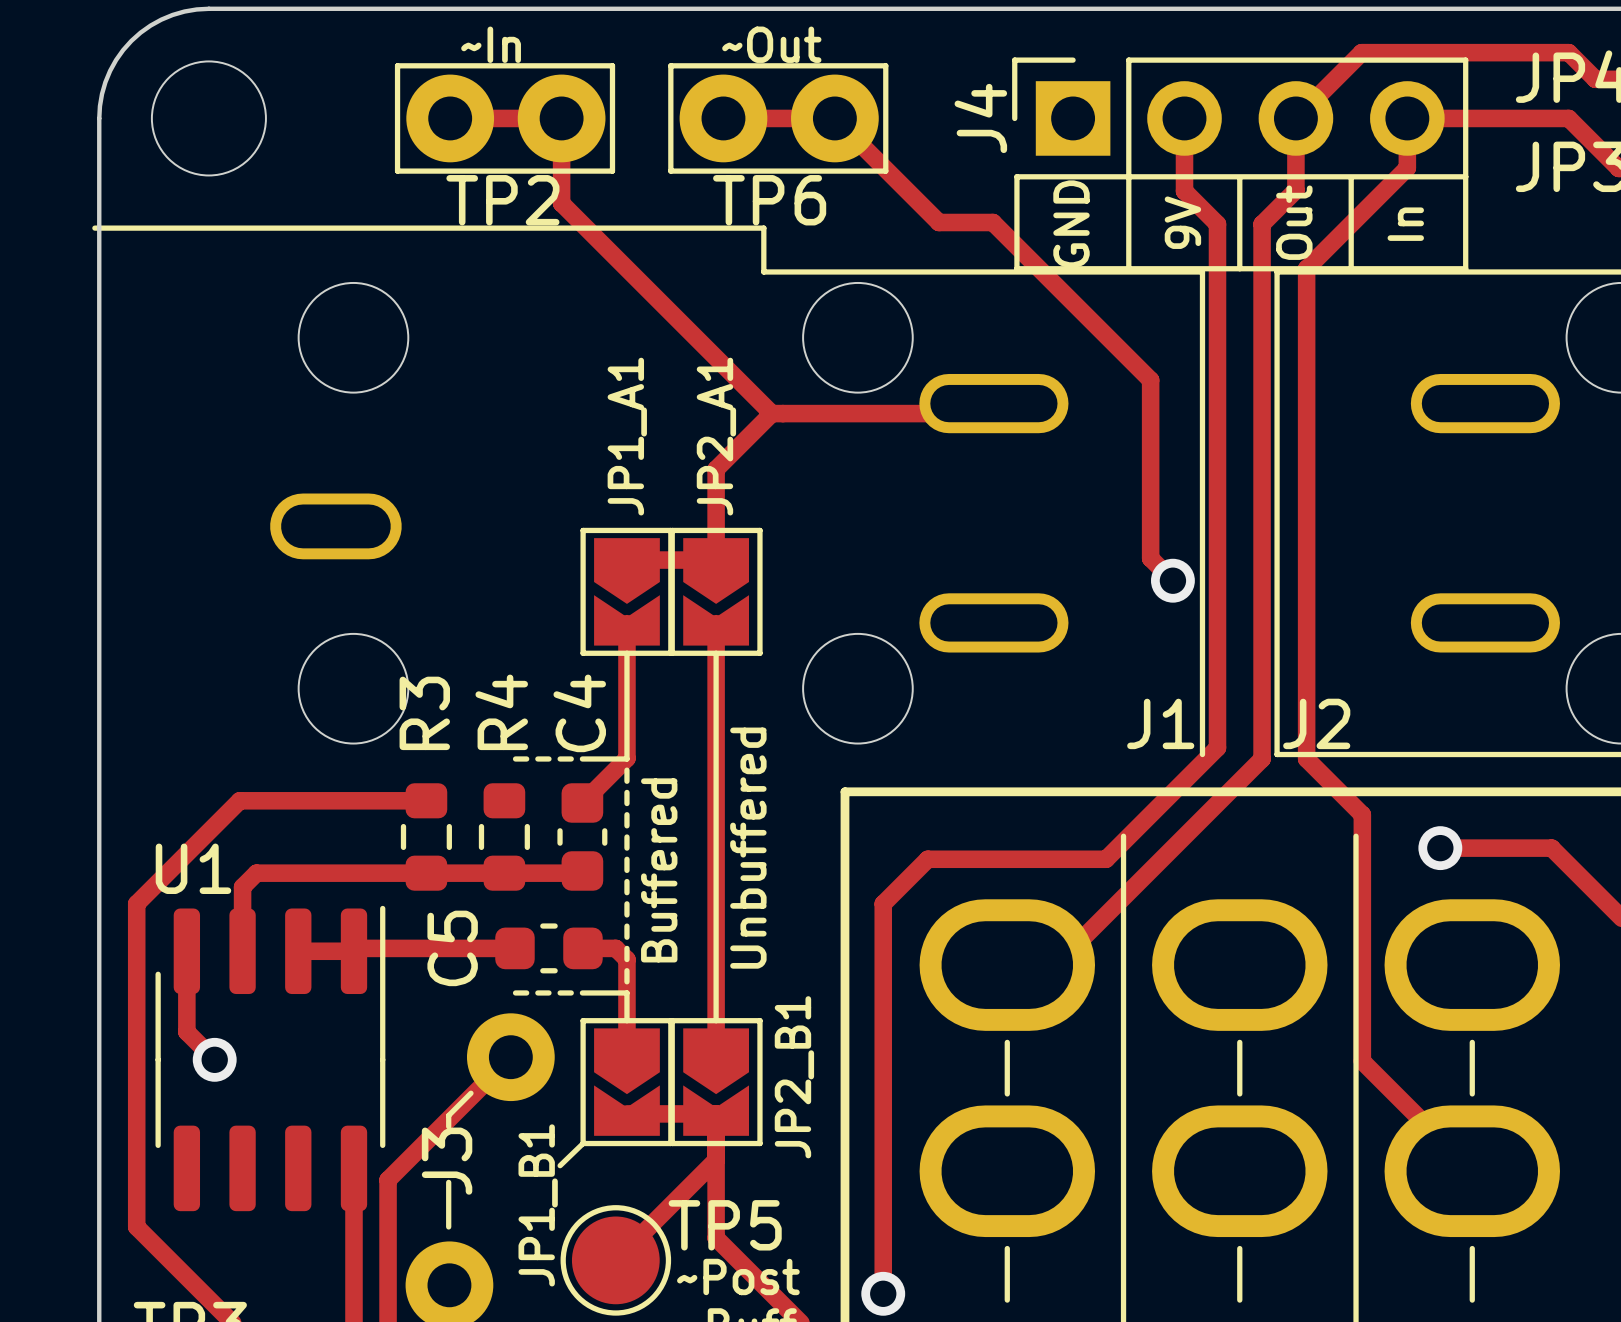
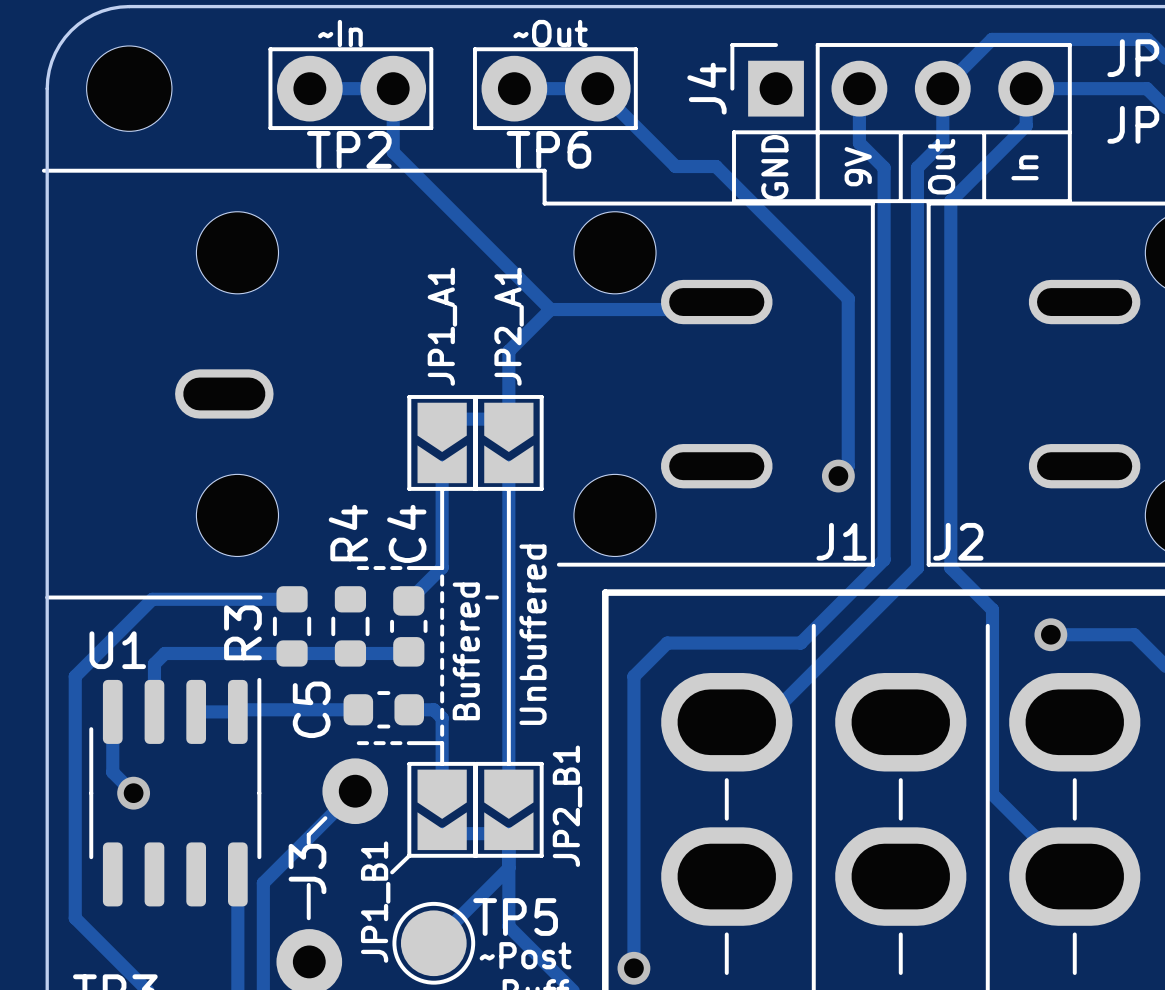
track: (1150, 380) (1150, 558) (1172, 580) -> (834, 284) (848, 298) (848, 466) (838, 476)
via position: (1172, 580) -> (838, 476)
R3 name position: R3 (424, 713) -> R3 (242, 632)
line: none -> (558, 564) (873, 564)
line: none -> (47, 597) (260, 597)
line: none -> (487, 597) (496, 597)

